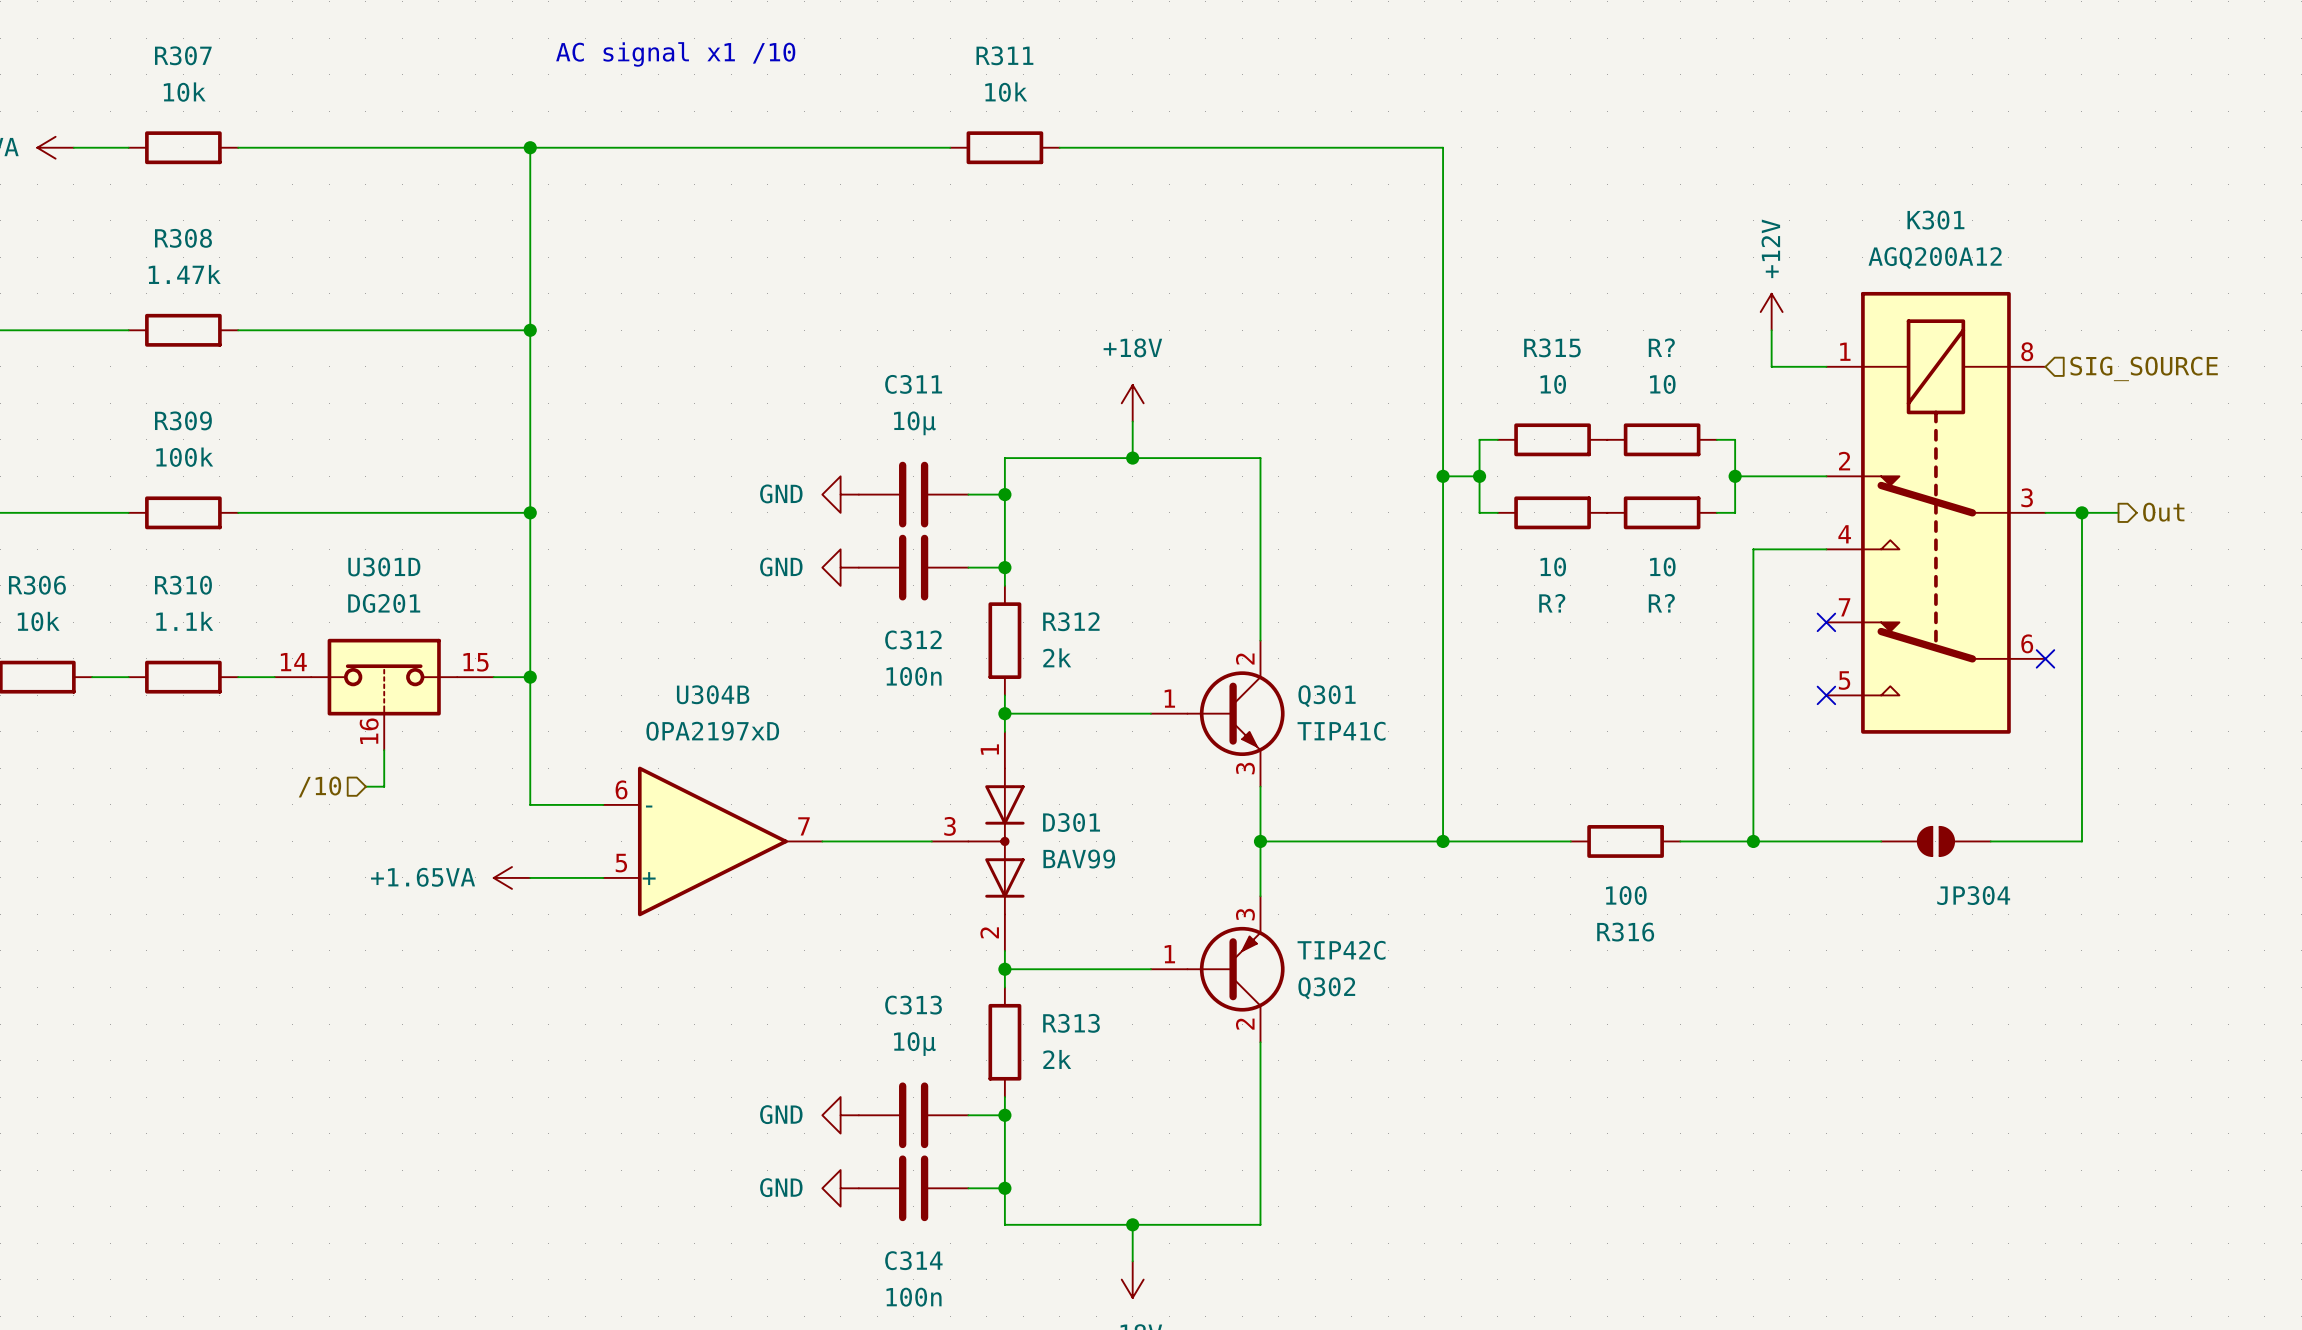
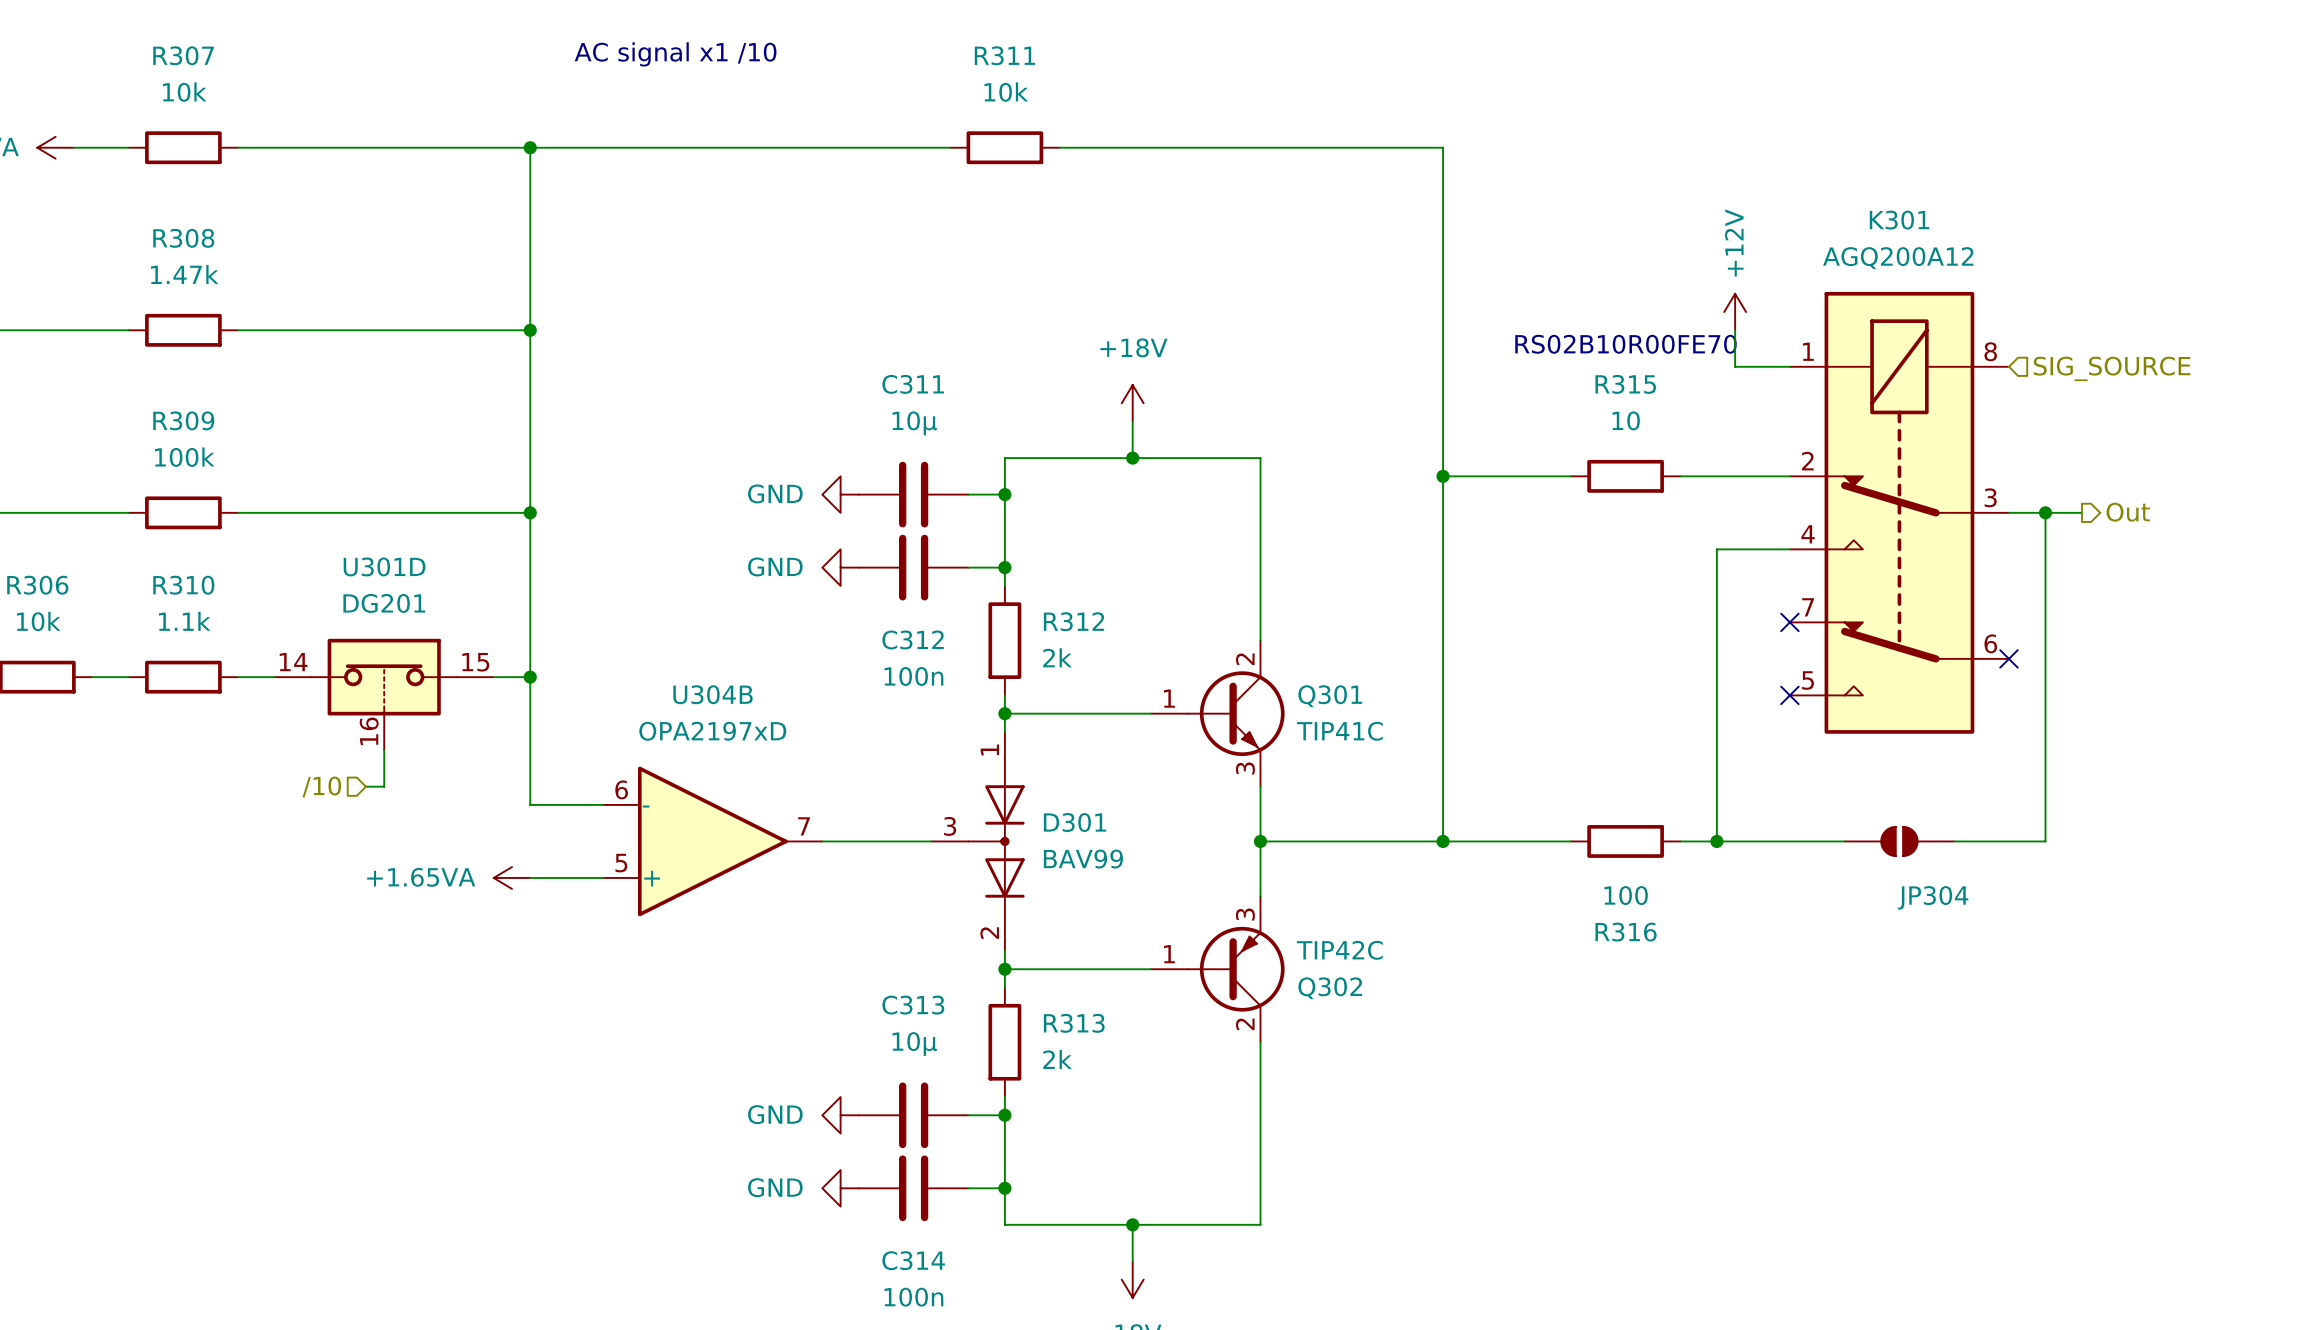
power symbol position: +12V (1771, 312) -> +12V (1735, 312)
wire: (1771, 330) (1771, 366) -> (1735, 330) (1735, 366) (1771, 366)
text: none -> RS02B10R00FE70 (1626, 344)
hierarchical label position: SIG_SOURCE (2144, 368) -> SIG_SOURCE (2112, 368)
wire: (1497, 439) (1479, 439) (1479, 512) (1497, 512) -> none
R315 position: (1552, 439) -> (1625, 476)
R?: 10 (1662, 439) -> none
wire: (1716, 439) (1735, 439) (1735, 512) (1716, 512) -> none
wire: none -> (1479, 476) (1570, 476)
junction: (1479, 476) -> none
wire: none -> (1680, 476) (1735, 476)
junction: (1735, 476) -> none
R?: 10 (1552, 512) -> none
R?: 10 (1662, 512) -> none
K301 position: (1935, 512) -> (1899, 512)
junction position: (2081, 512) -> (2045, 512)
wire: (2118, 512) (2081, 512) (2081, 841) (2045, 841) -> (2008, 512) (2045, 512) (2045, 841)
hierarchical label position: Out (2163, 512) -> Out (2128, 512)
wire: (1753, 549) (1753, 841) -> (1753, 549) (1716, 549) (1716, 841)
no-connect mark position: (1826, 622) -> (1789, 622)
no-connect mark position: (2045, 658) -> (2008, 658)
no-connect mark position: (1826, 695) -> (1789, 695)
junction position: (1753, 841) -> (1716, 841)
JP304 position: (1935, 841) -> (1899, 841)

